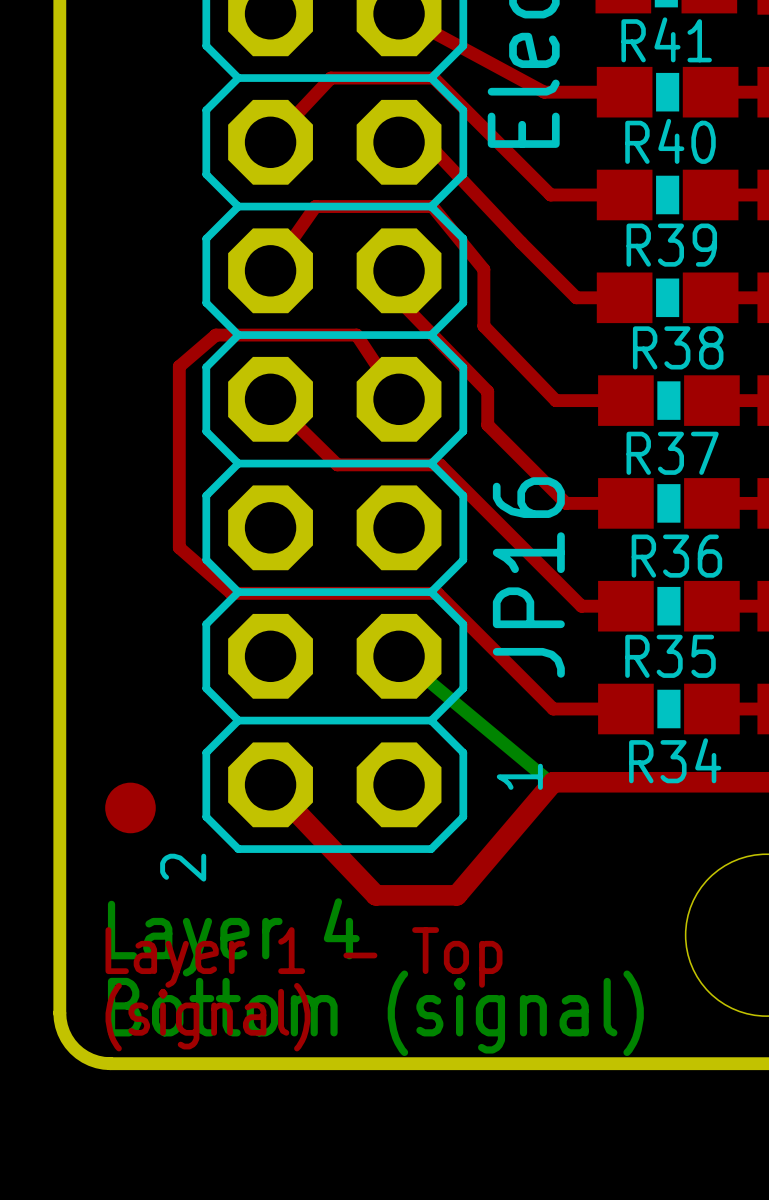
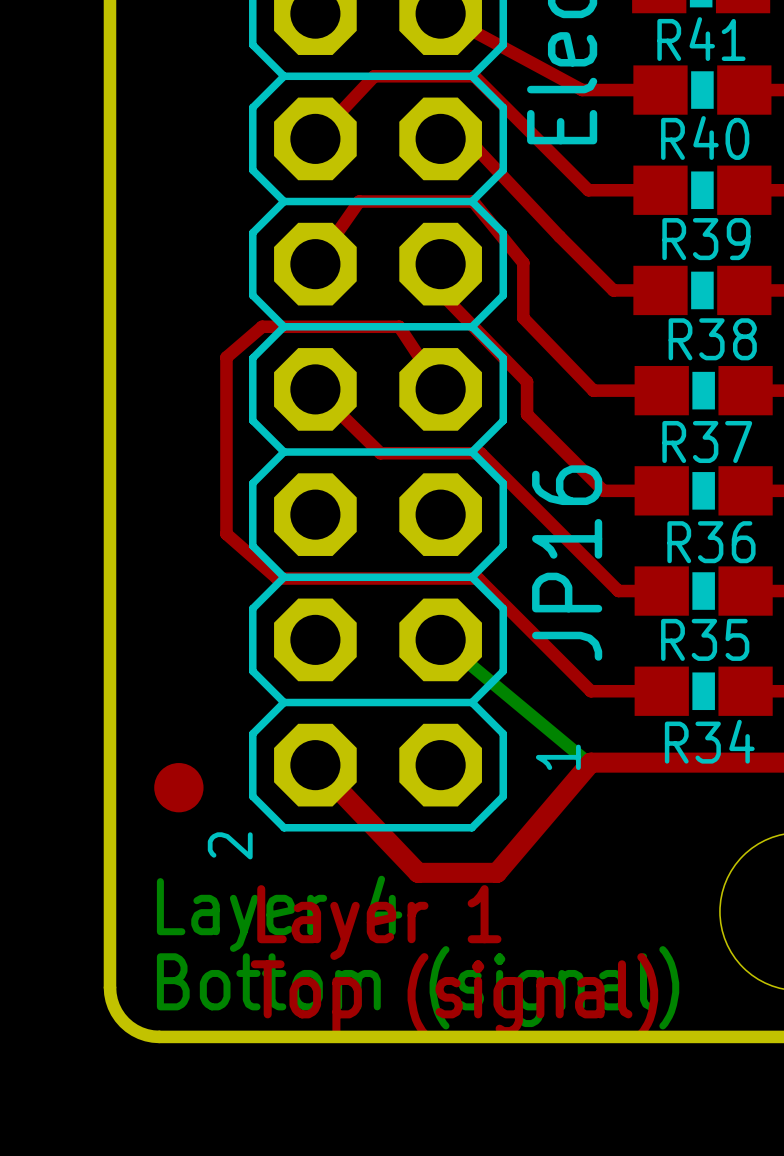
text: Layer 1 - Top (304, 957) -> Layer 1 (379, 922)
text: (signal) (207, 1017) -> Top (signal) (454, 995)

